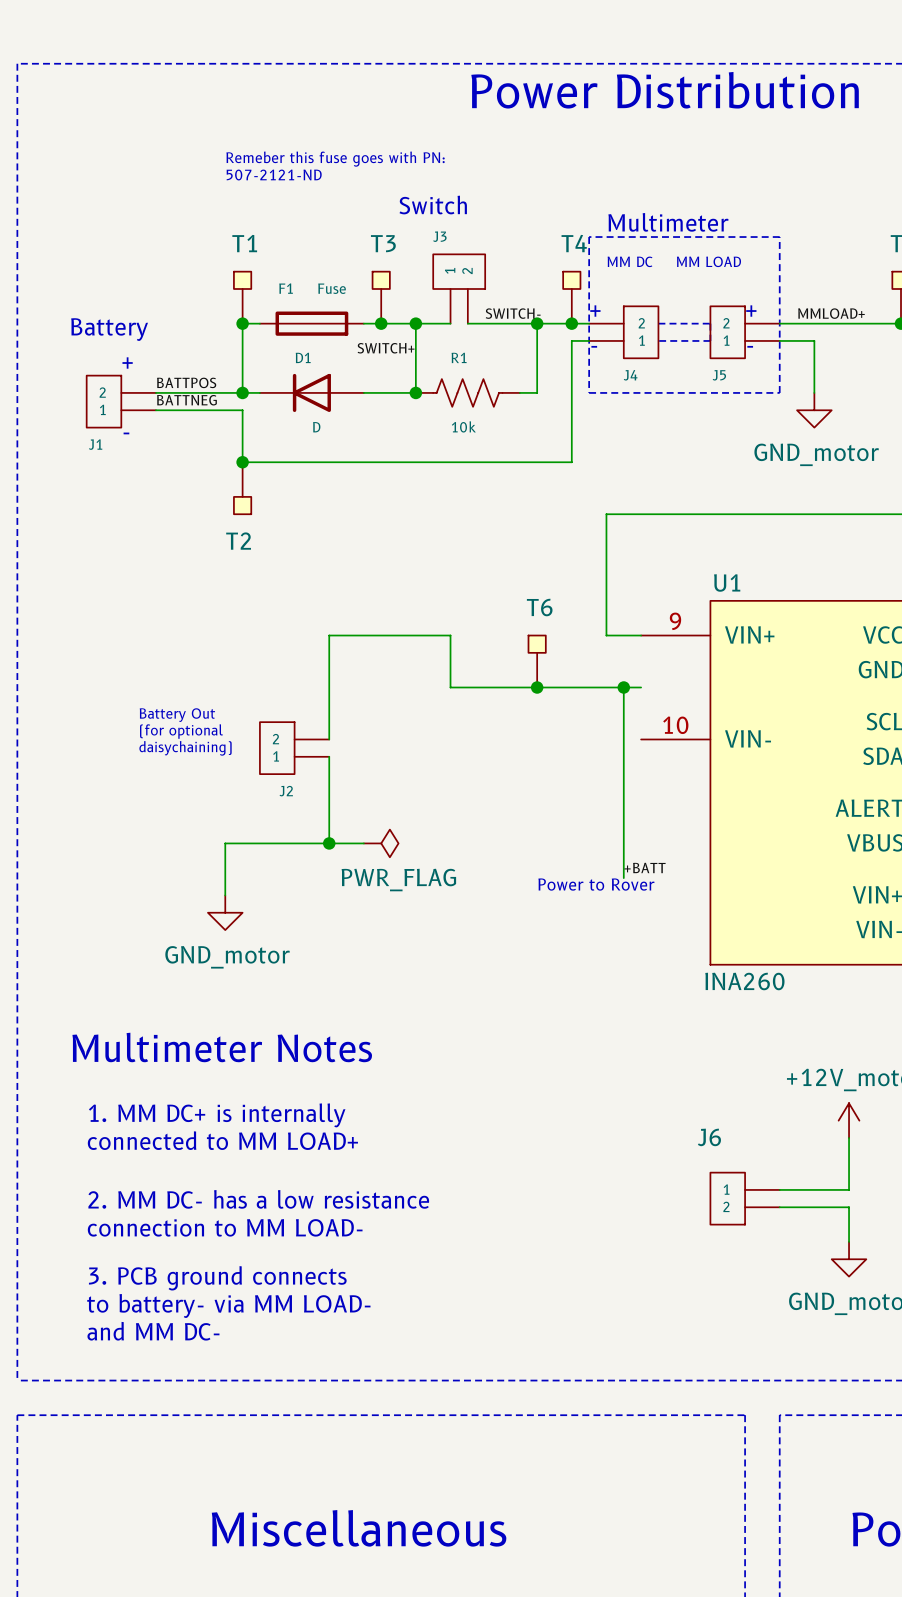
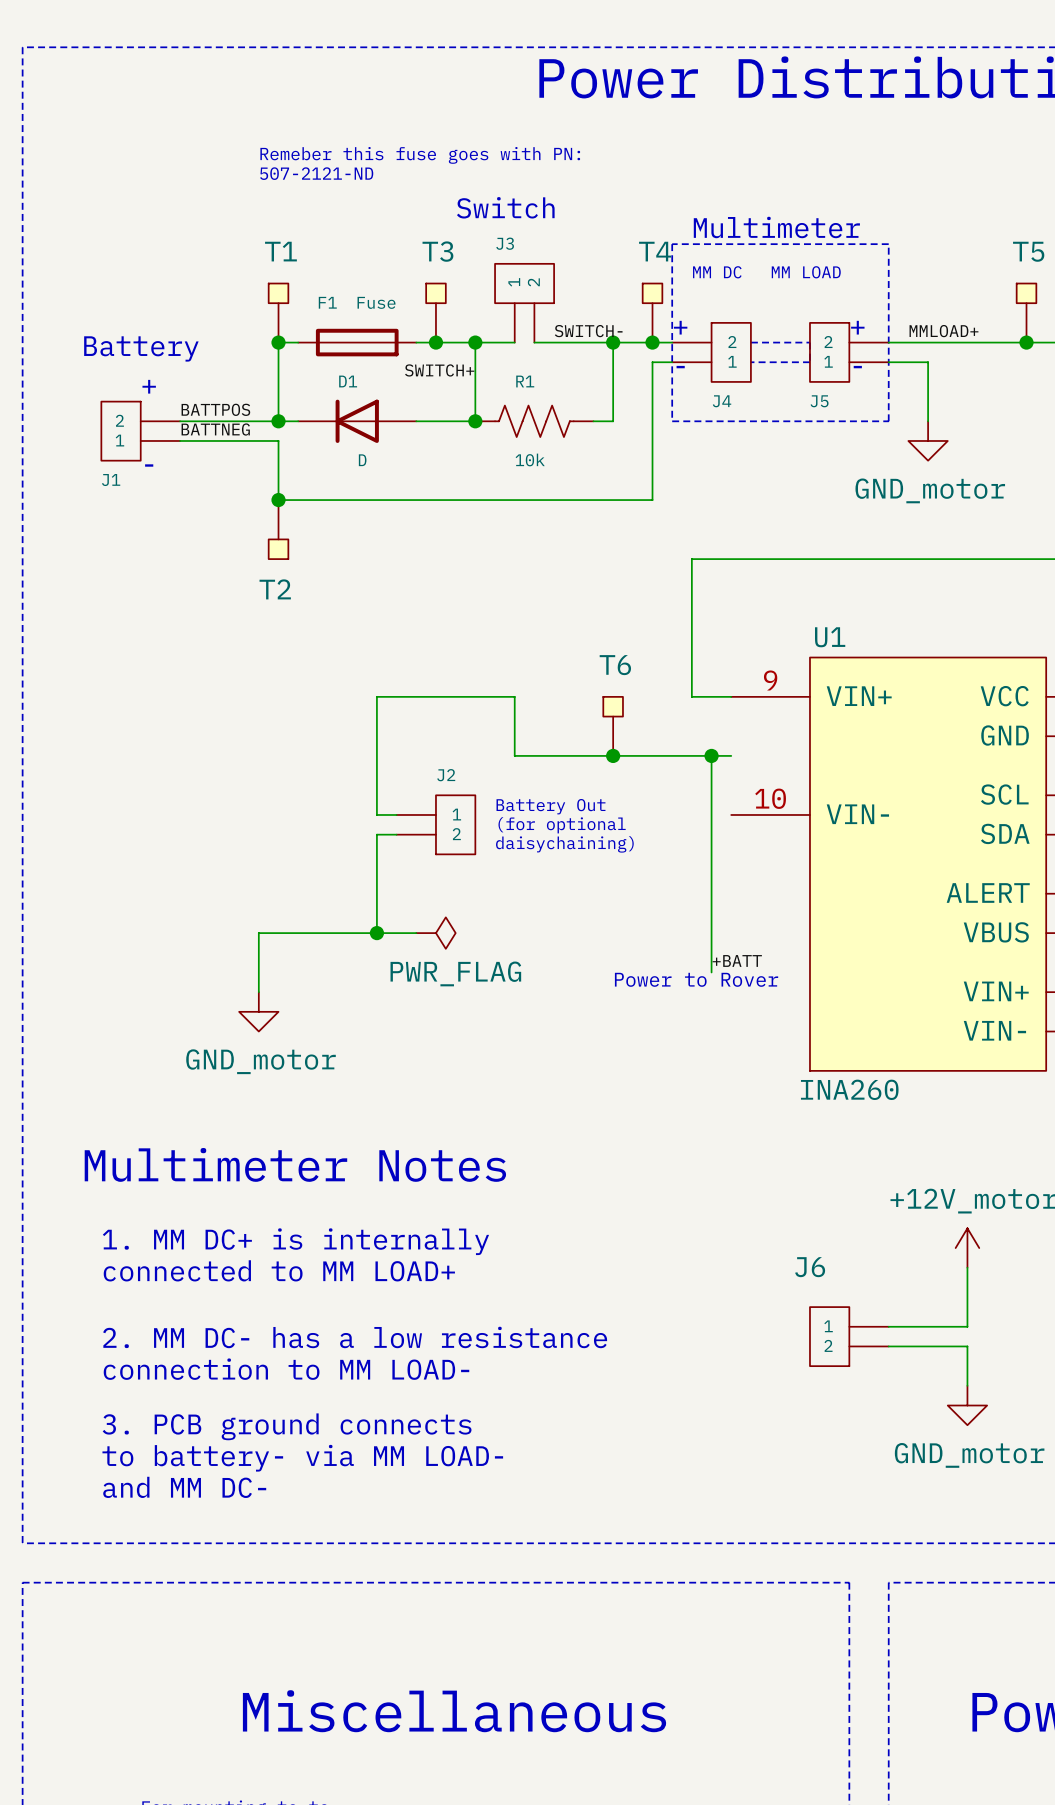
text position: Battery Out (177, 715) -> Battery Out (550, 806)
text position: (for optional (181, 731) -> (for optional (562, 825)
wire: none -> (376, 814) (396, 814)
text position: daisychaining) (185, 748) -> daisychaining) (564, 844)
J2 rotation: 0° (277, 748) -> 180° (455, 824)
J2 position: (294, 748) -> (435, 824)
wire: none -> (376, 834) (396, 834)

